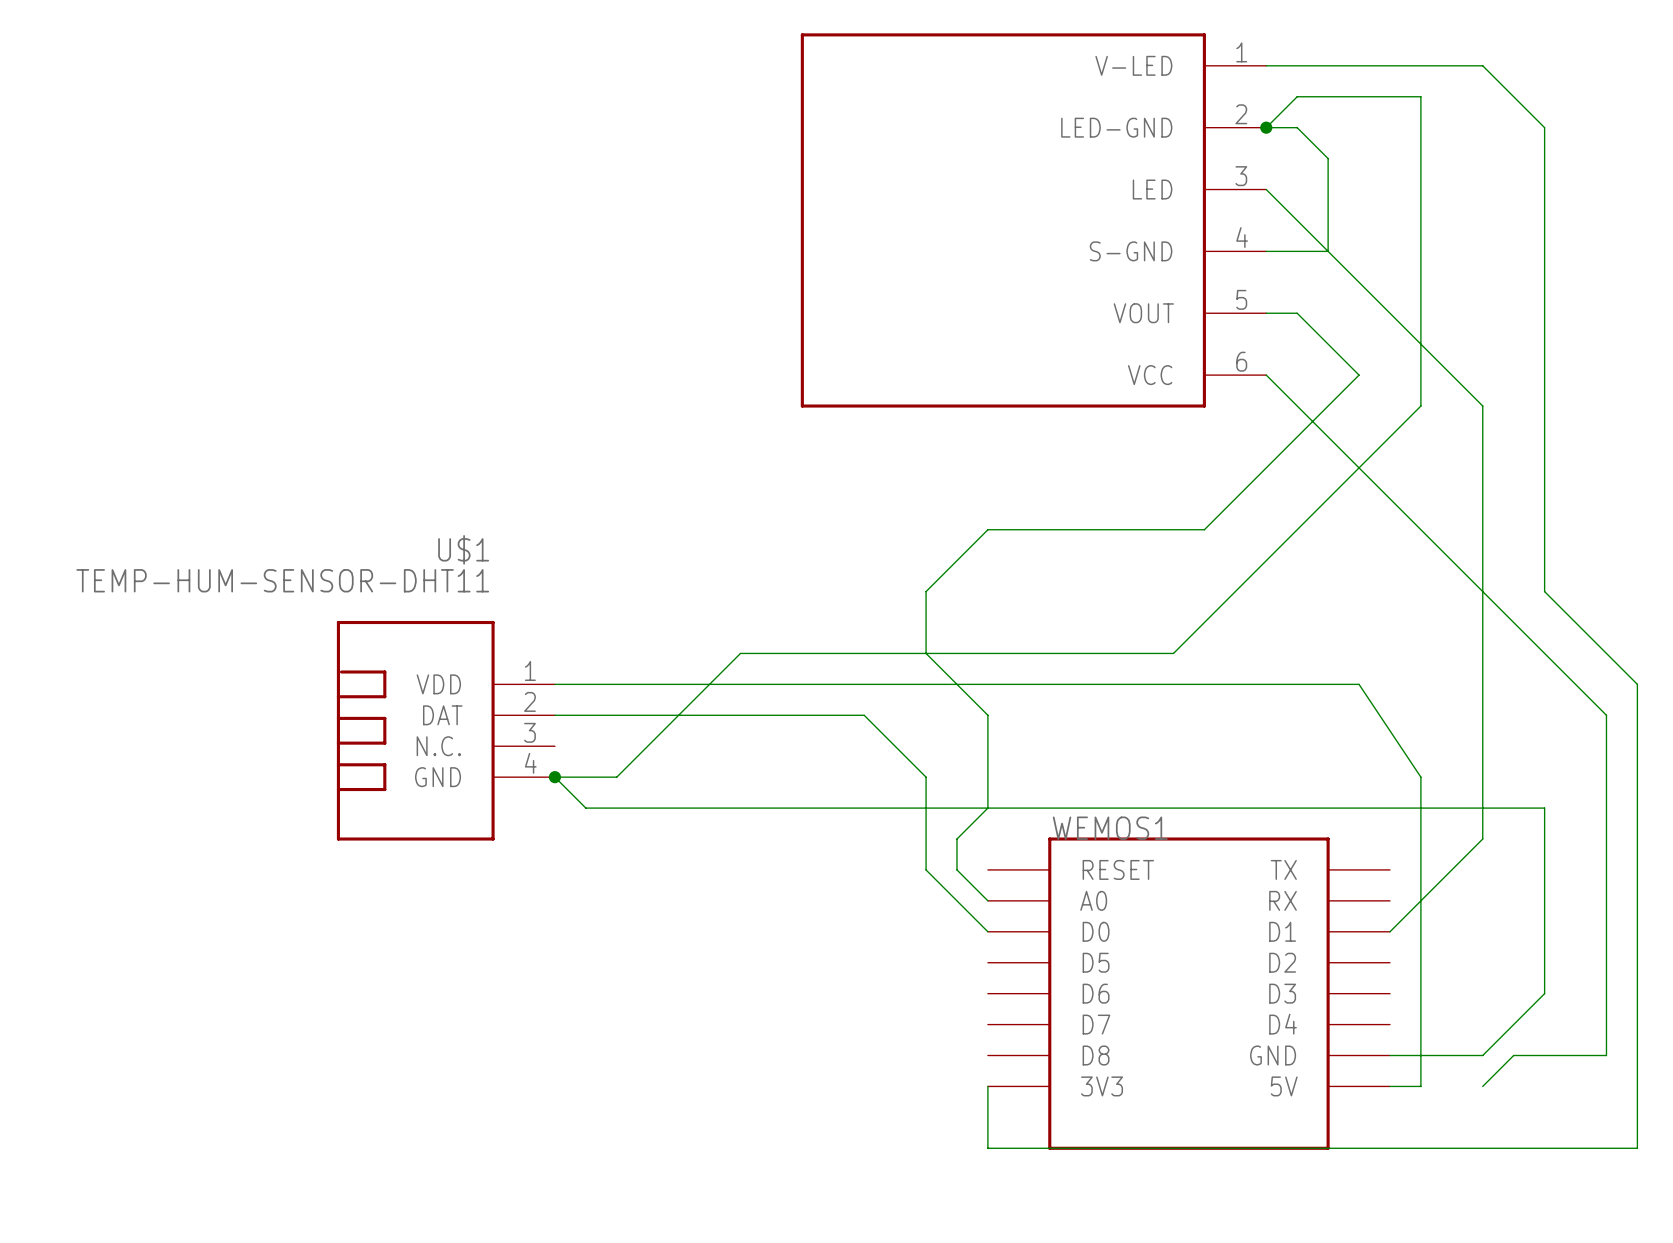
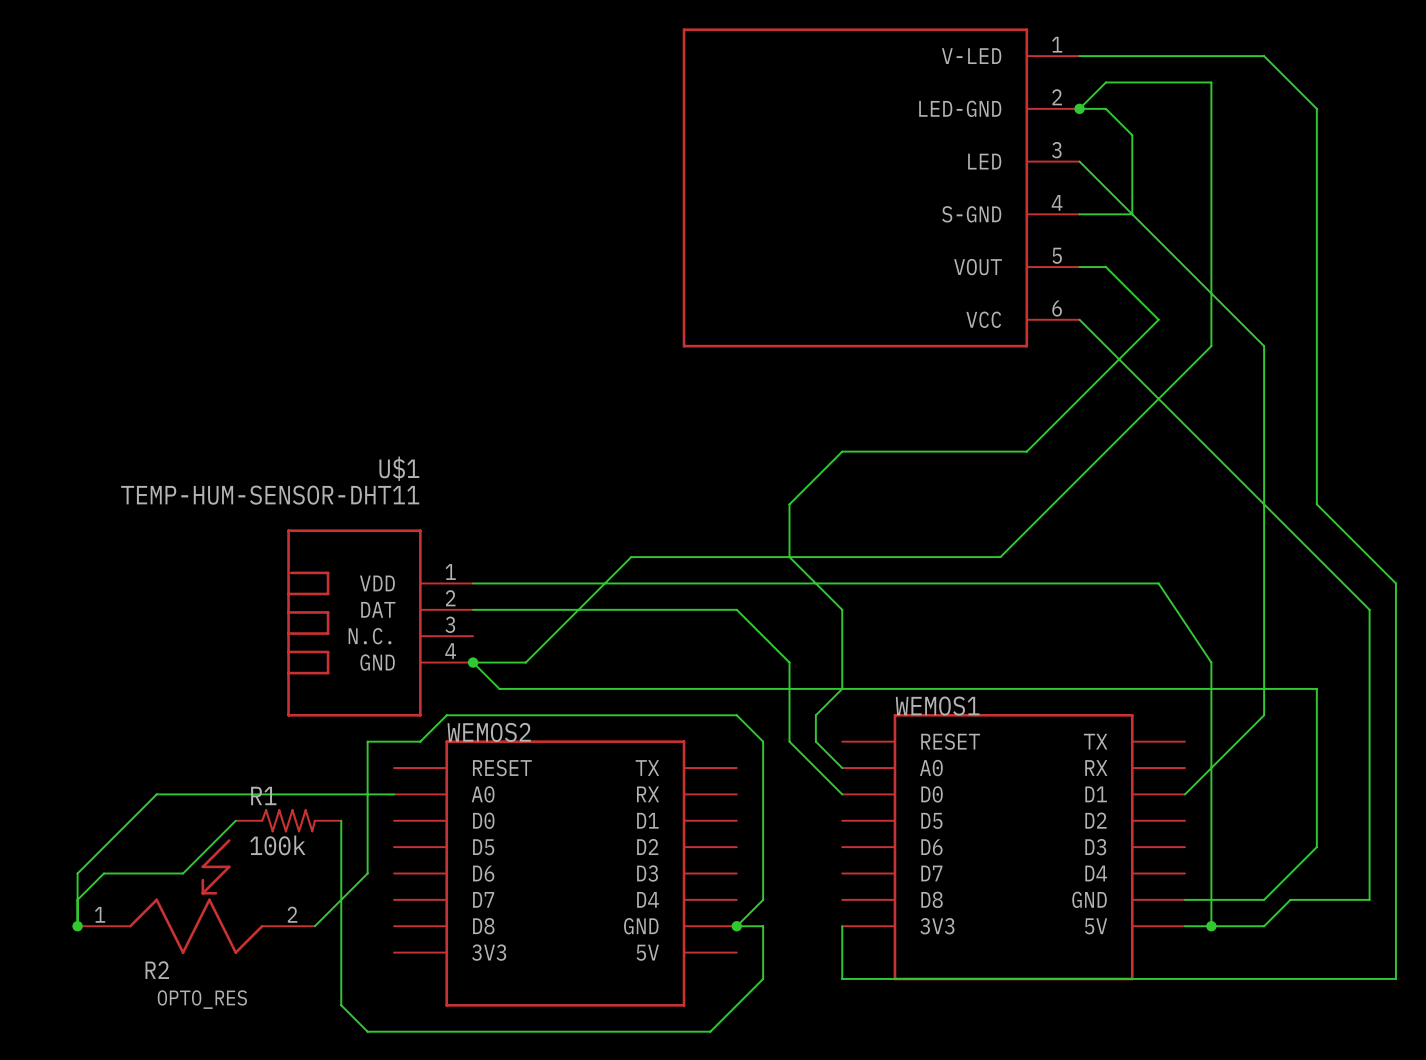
wire: none -> (393, 794) (156, 794) (77, 873) (77, 926)
wire: none -> (235, 820) (183, 873) (103, 873) (77, 899)
R1: none -> 100k (288, 820)
wire: none -> (341, 820) (341, 1005) (367, 1031) (710, 1031) (763, 978) (763, 926) (736, 926) (763, 899) (763, 741) (736, 715) (446, 715) (420, 741) (367, 741) (367, 873) (314, 926)
WEMOS2: none -> (565, 873)
R2: none -> OPTO_RES (196, 896)
junction: none -> (77, 926)
junction: none -> (736, 926)
wire: none -> (1211, 926) (1264, 926)
junction: none -> (1211, 926)

